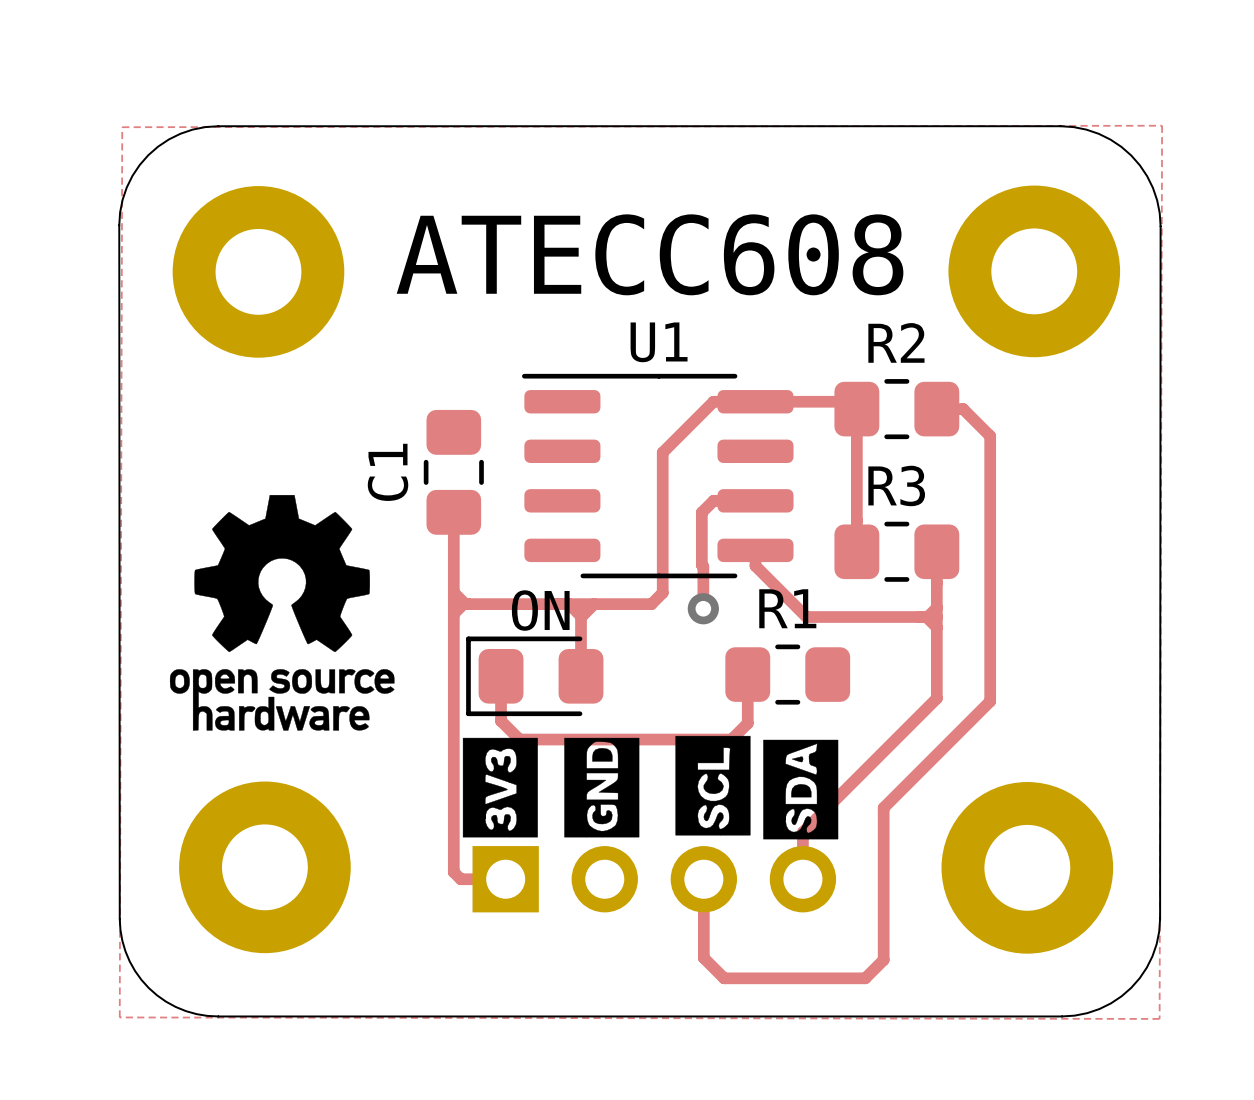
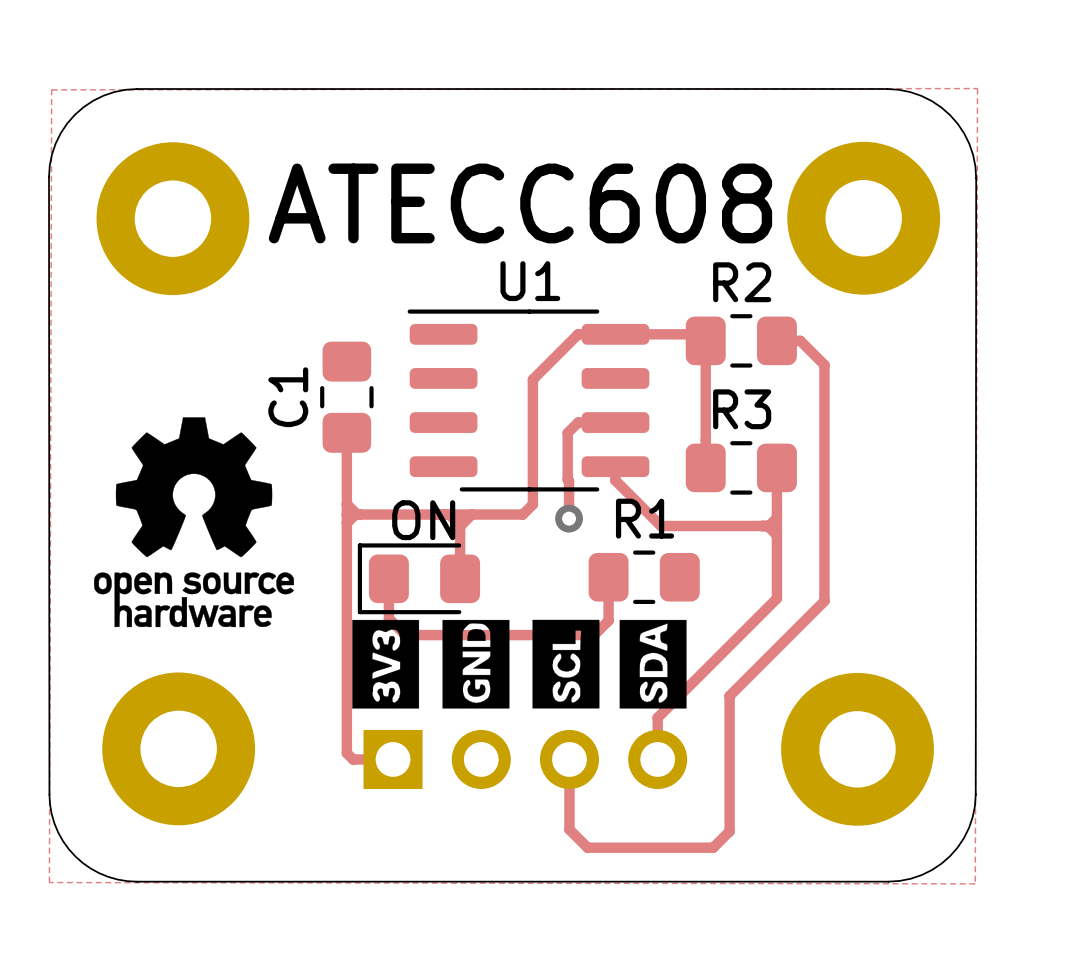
drawing position: (712, 785) -> (565, 664)
drawing position: (500, 787) -> (385, 664)
drawing position: (601, 787) -> (475, 664)
drawing position: (800, 789) -> (653, 664)

